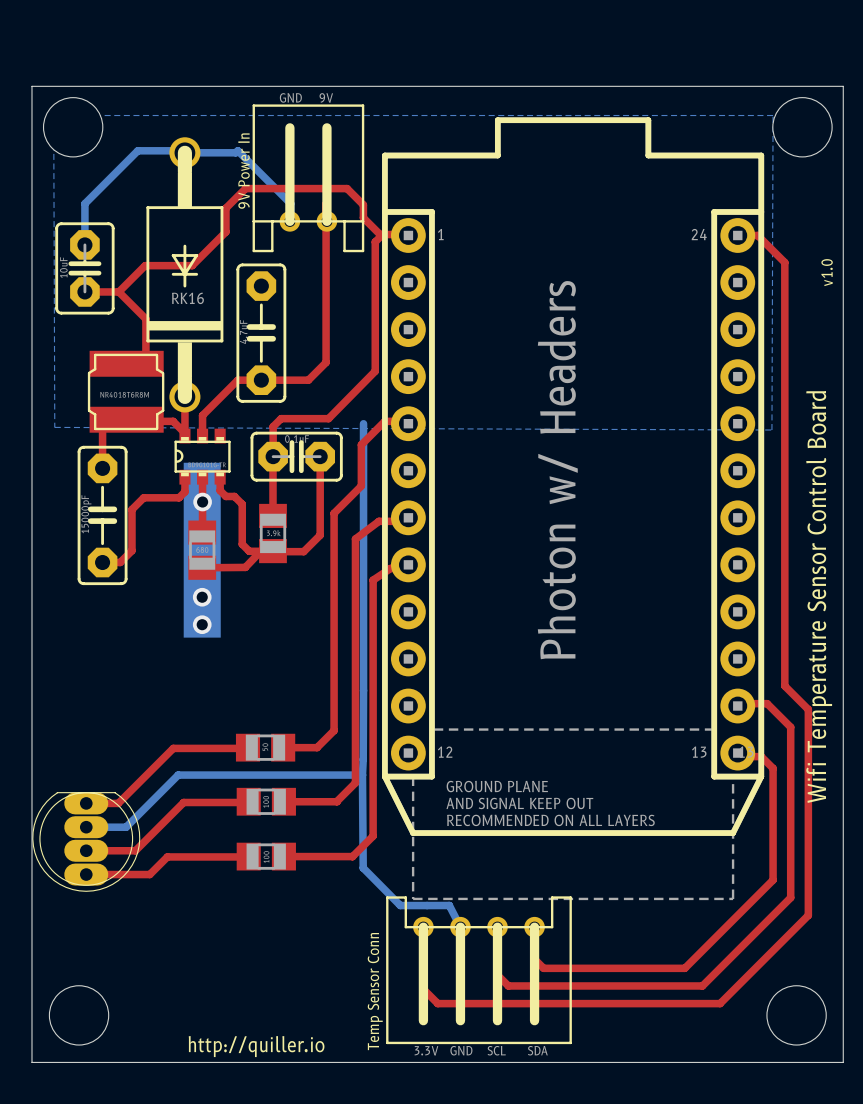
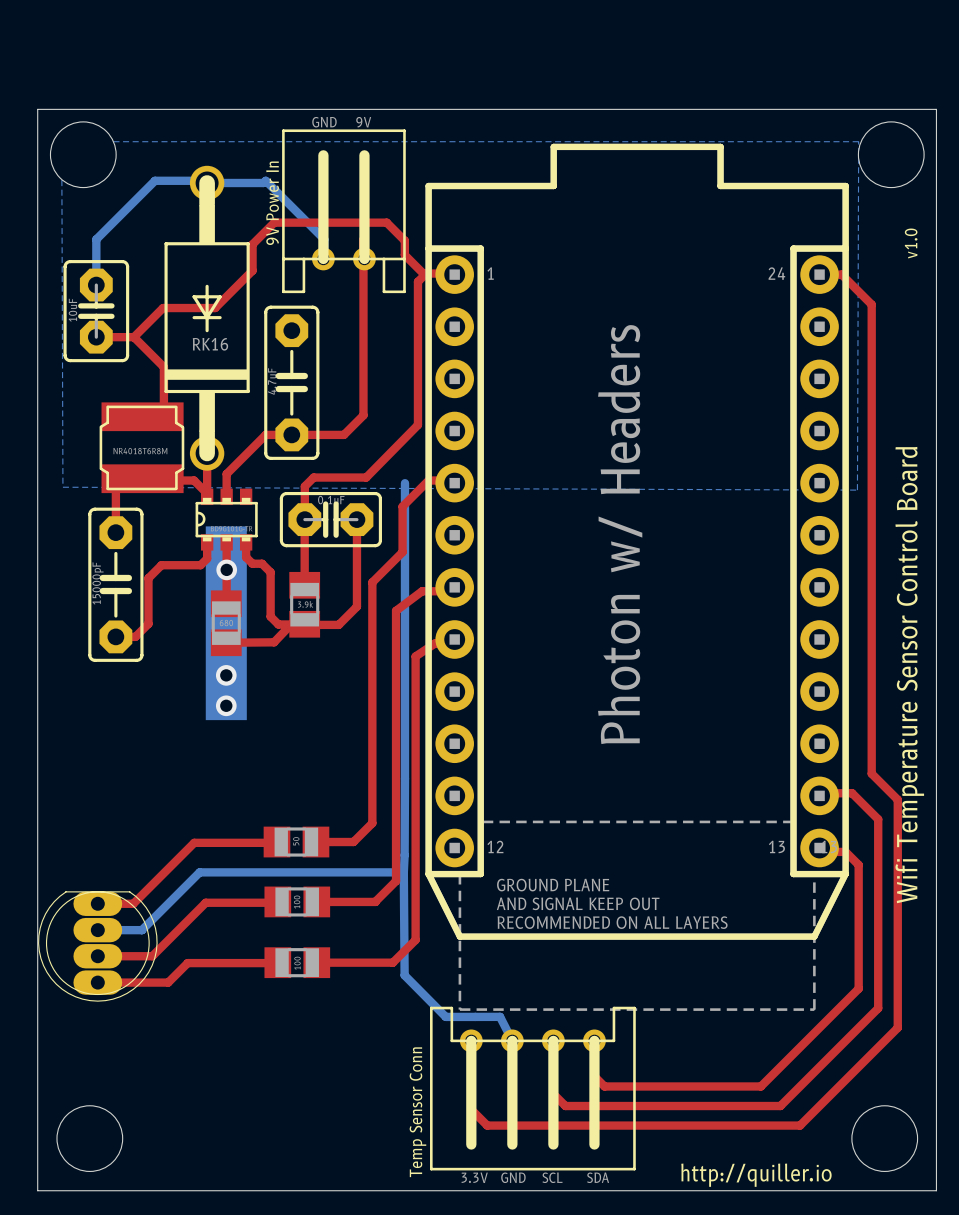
text position: v1.0 (827, 272) -> v1.0 (911, 243)
text position: http://quiller.io (256, 1046) -> http://quiller.io (756, 1175)

